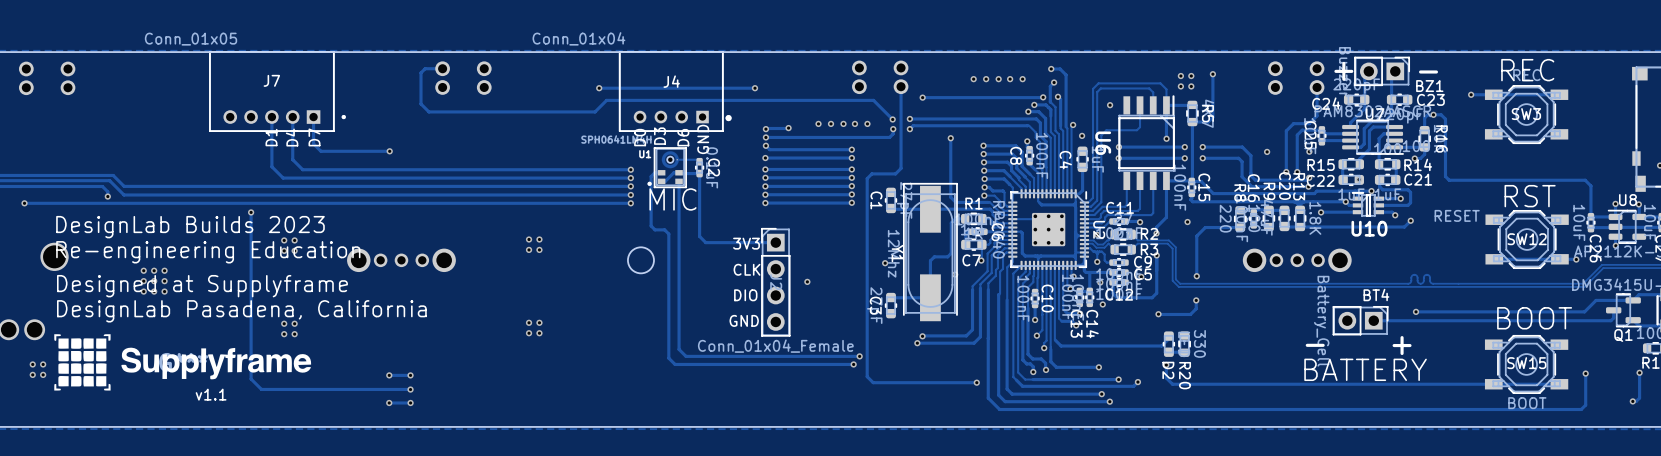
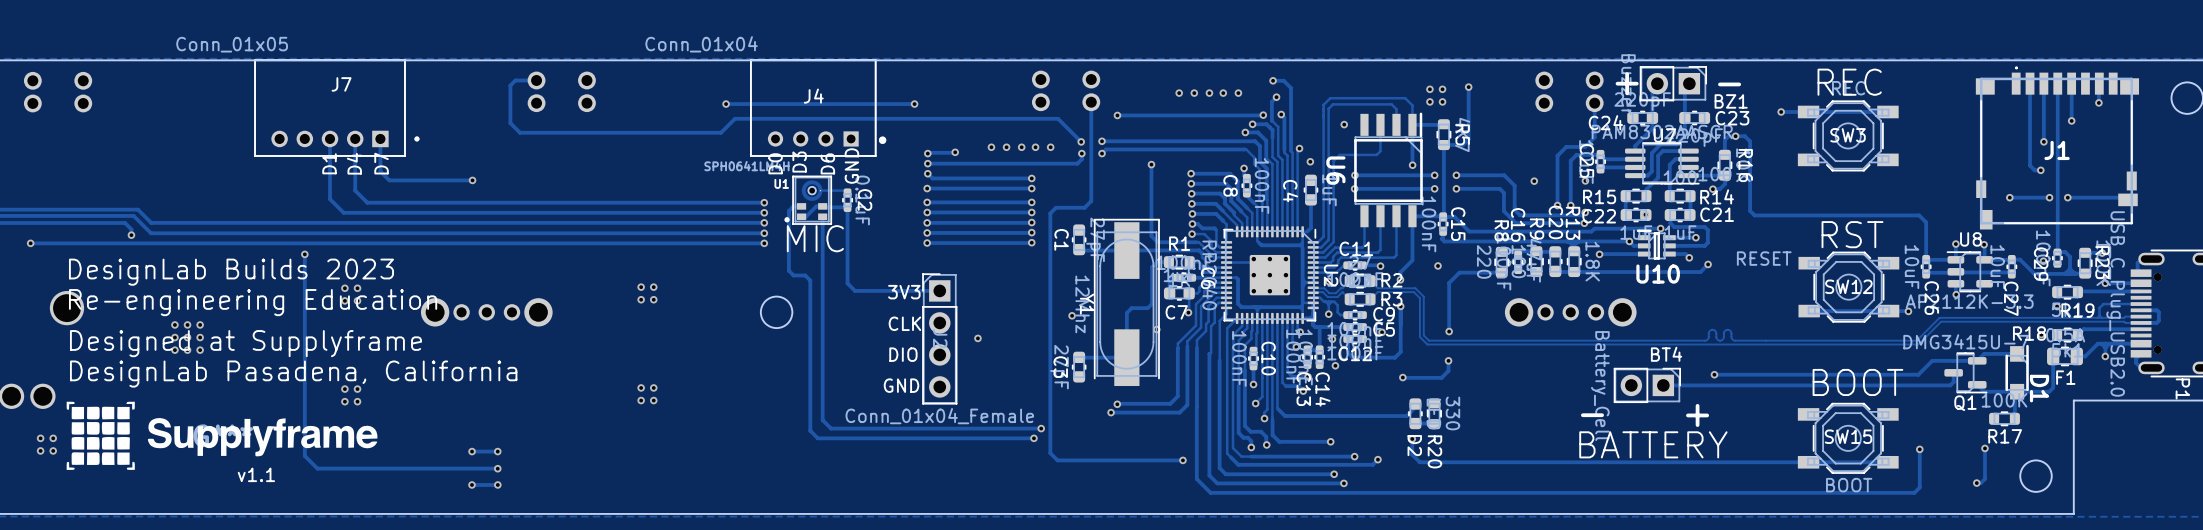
J7 name position: J7 (271, 80) -> J7 (341, 84)

